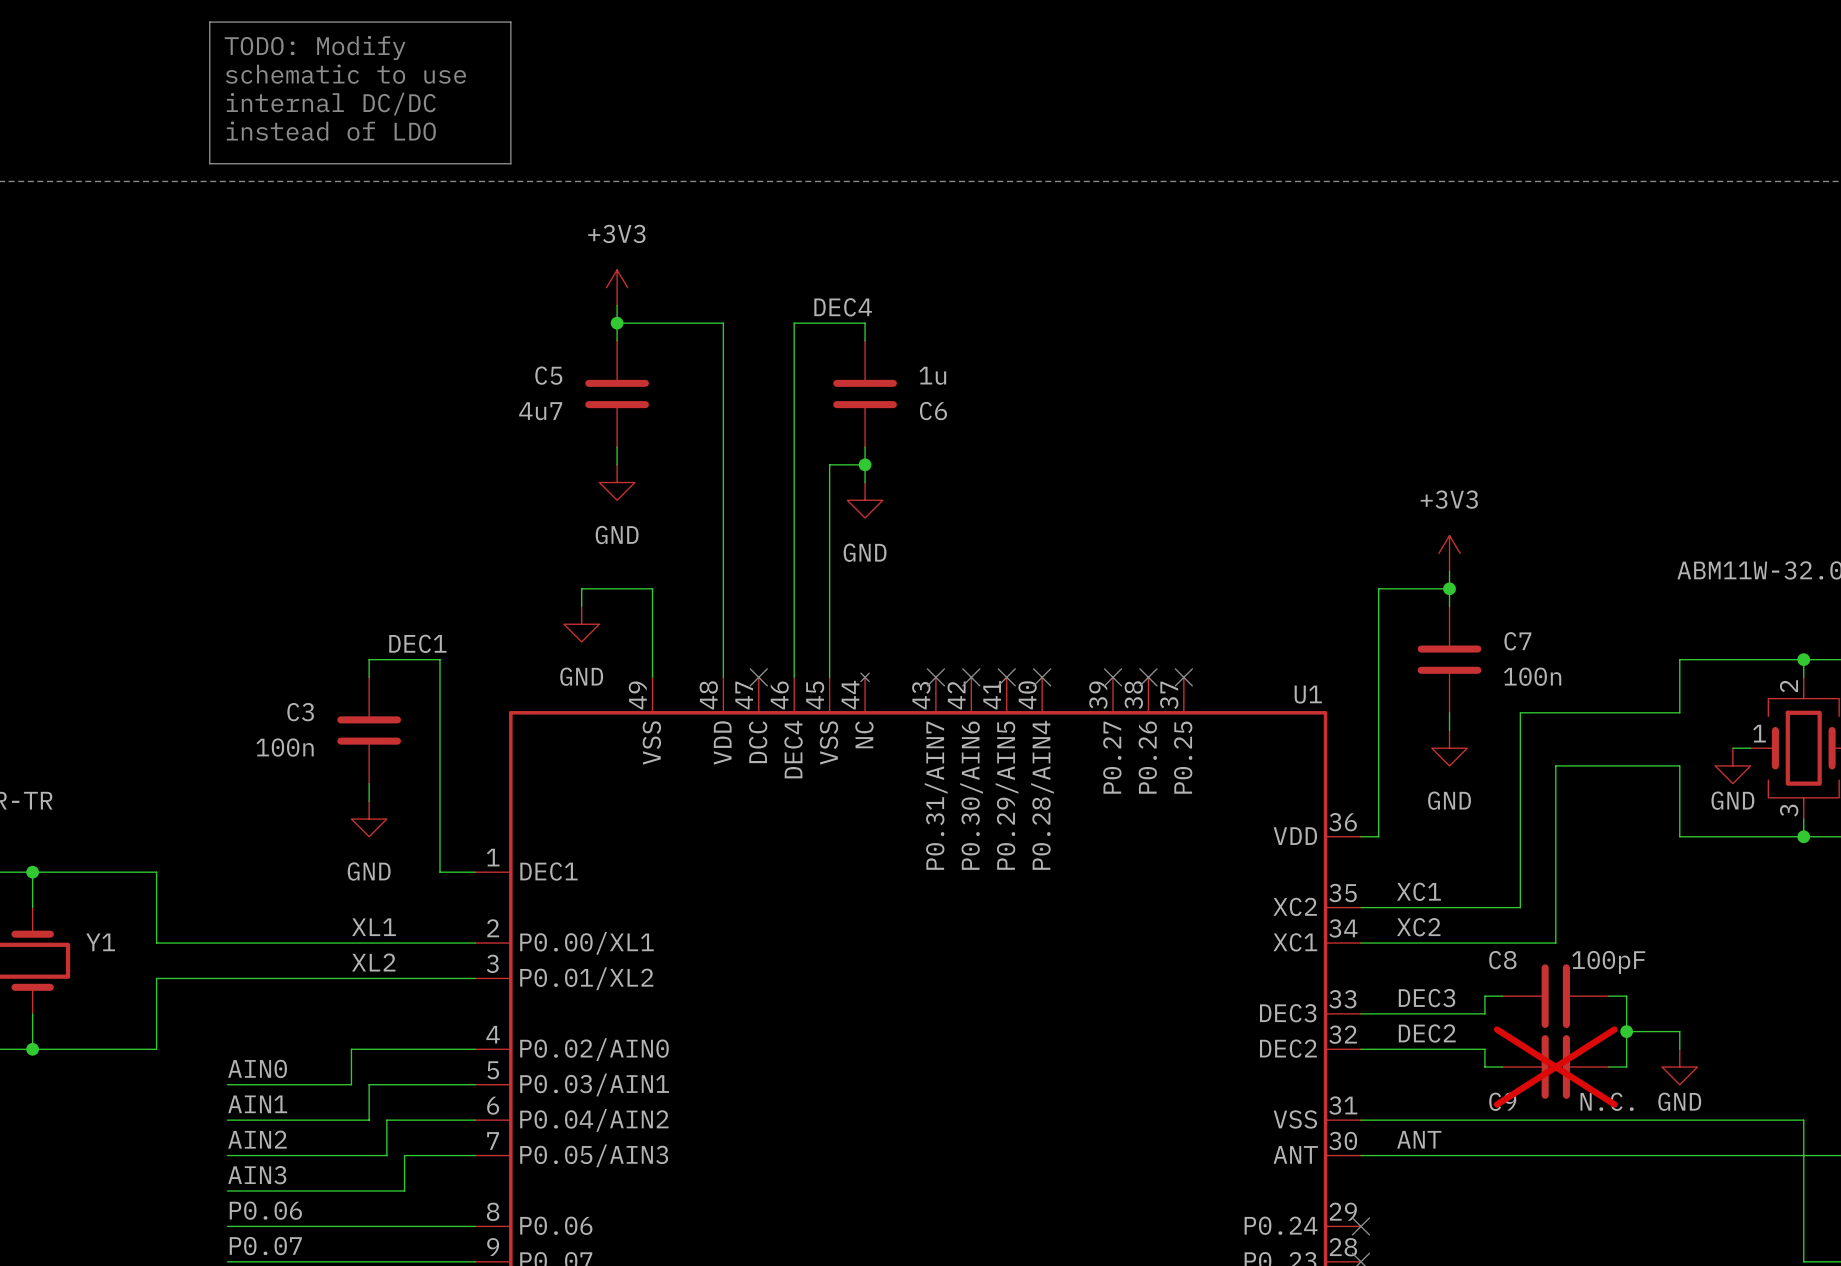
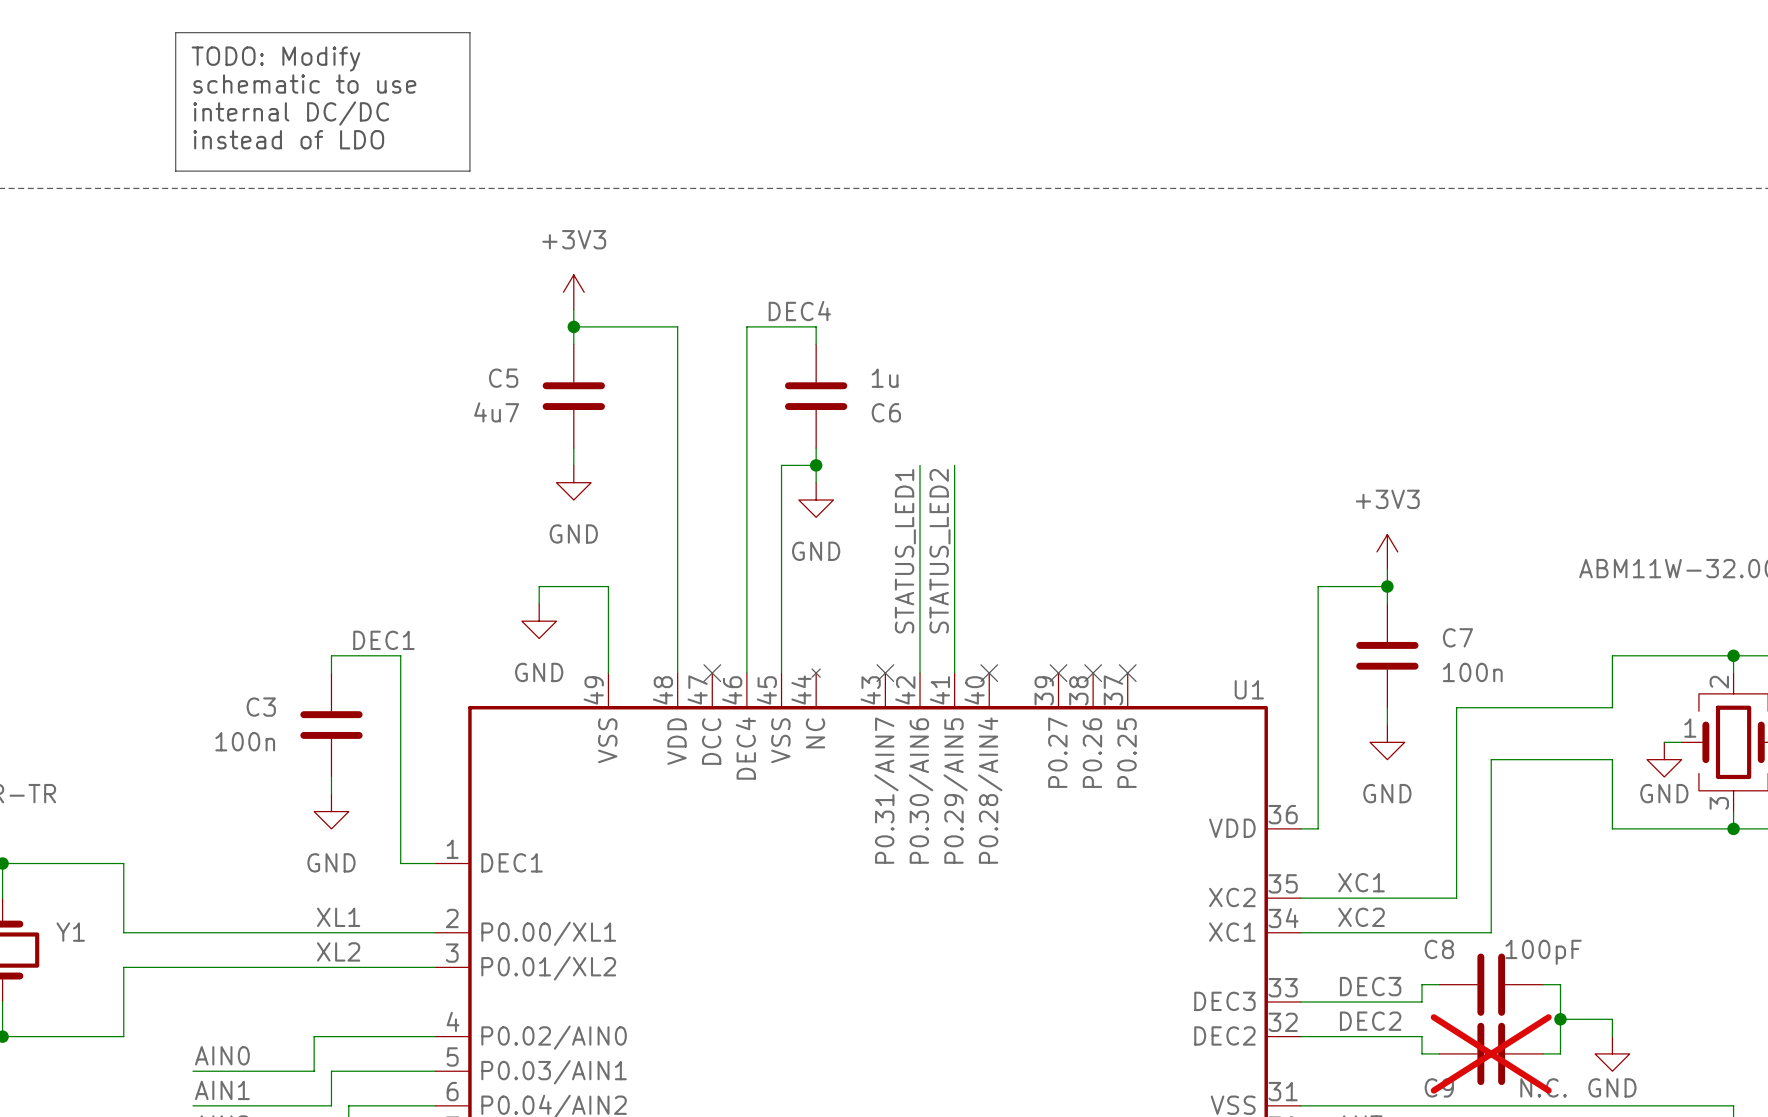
wire: none -> (920, 465) (920, 673)
wire: none -> (954, 465) (954, 673)
label: none -> STATUS_LED1 (905, 551)
label: none -> STATUS_LED2 (940, 551)
no-connect mark: (971, 677) -> none
no-connect mark: (1006, 677) -> none

